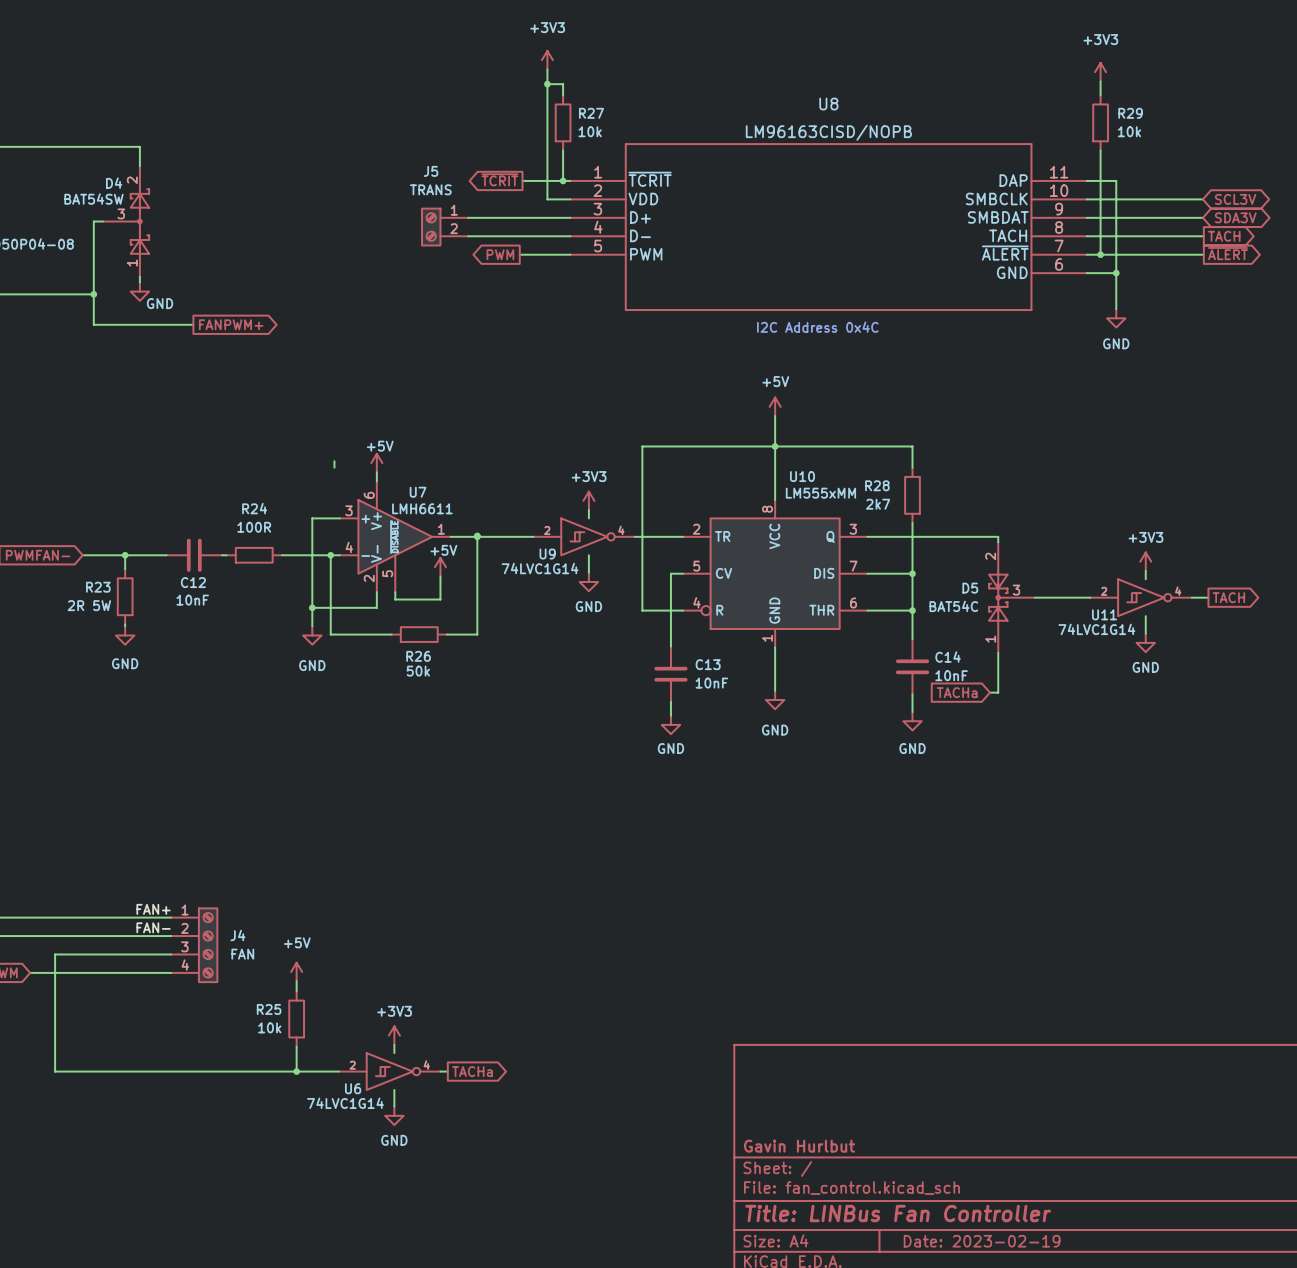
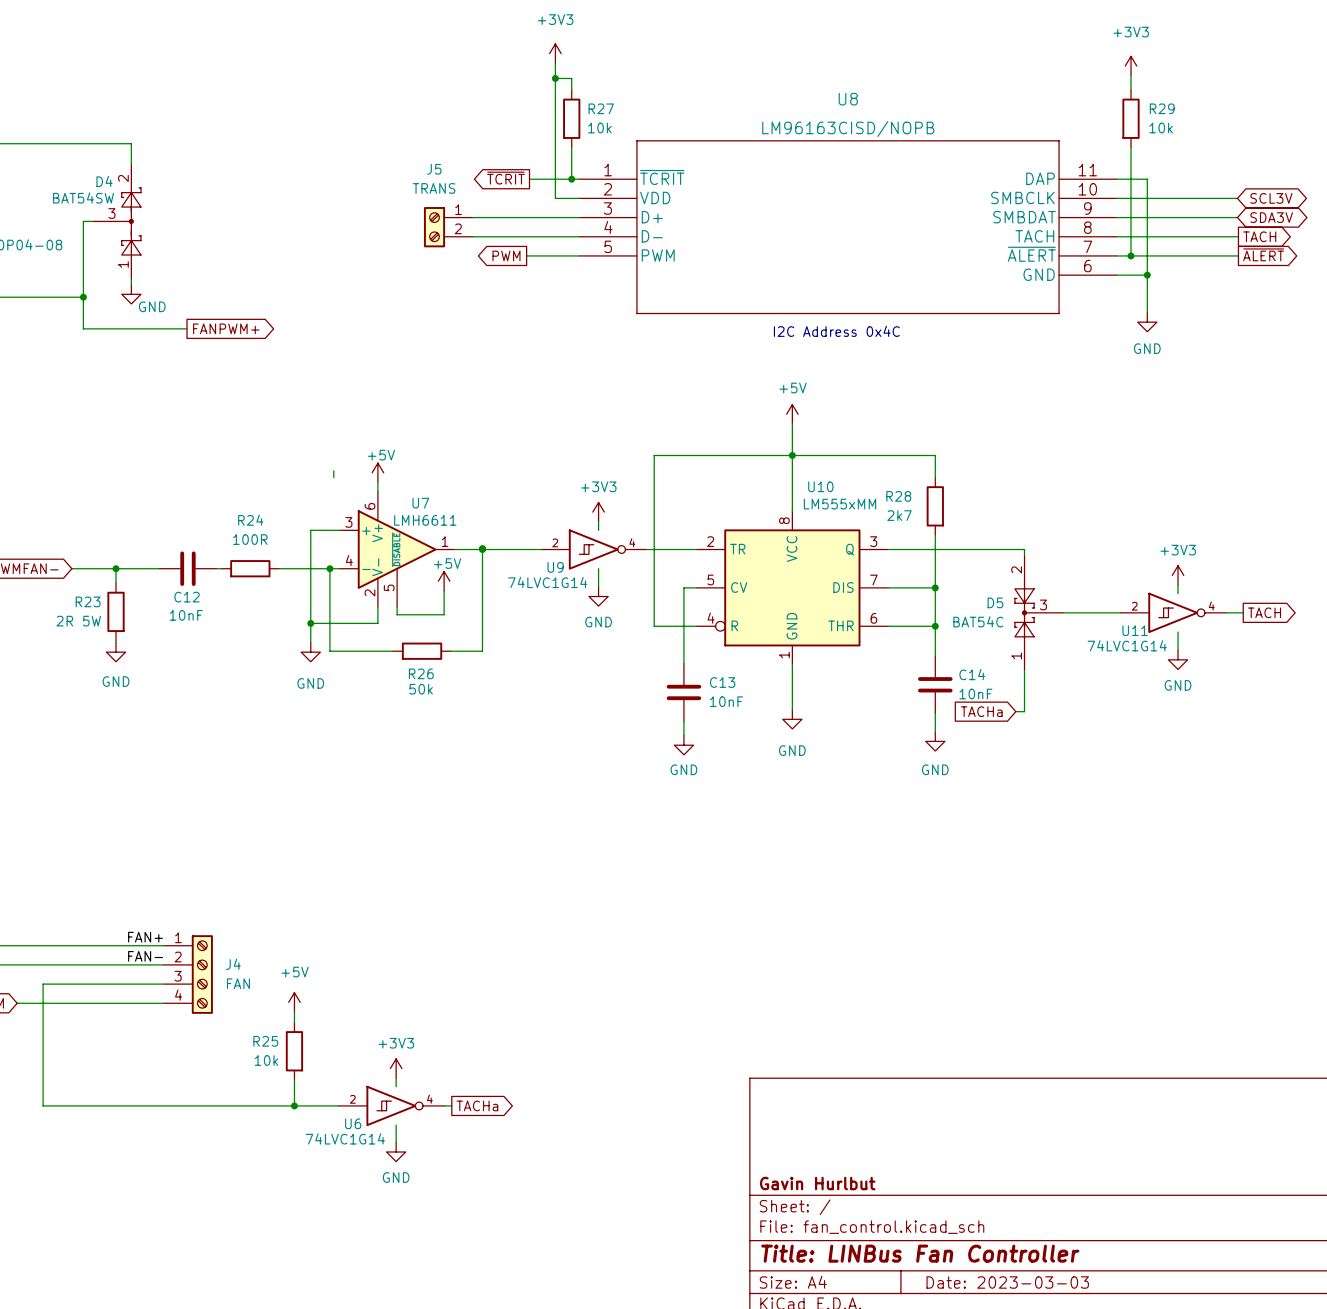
title block: Date: 2023-02-19 (982, 1241) -> Date: 2023-03-03 (1007, 1282)

